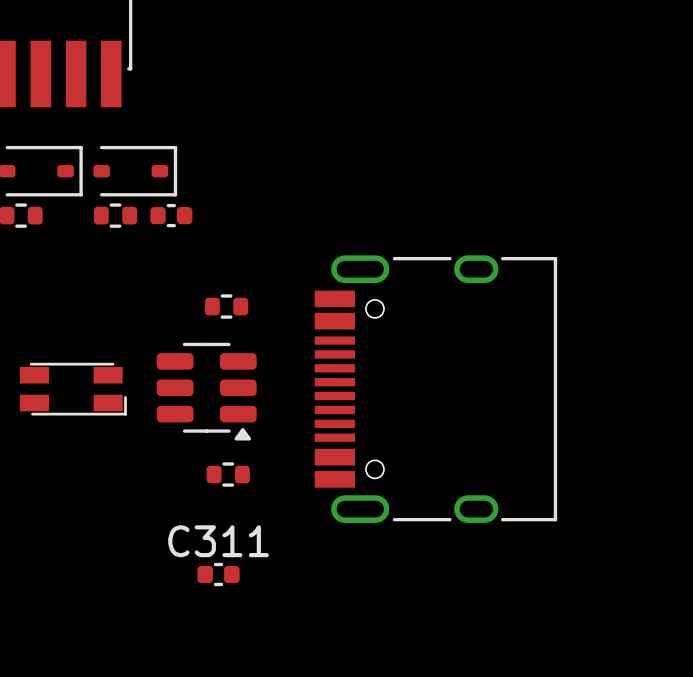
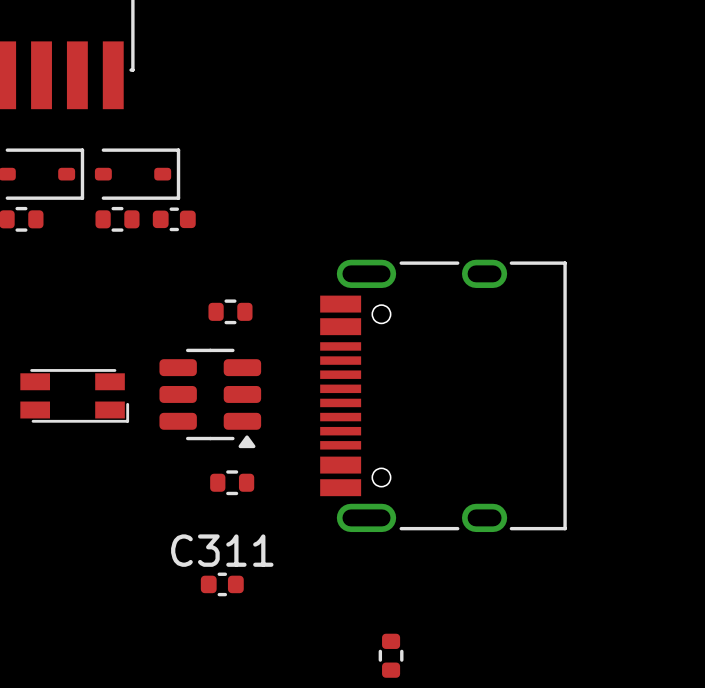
part: none -> (391, 655)

